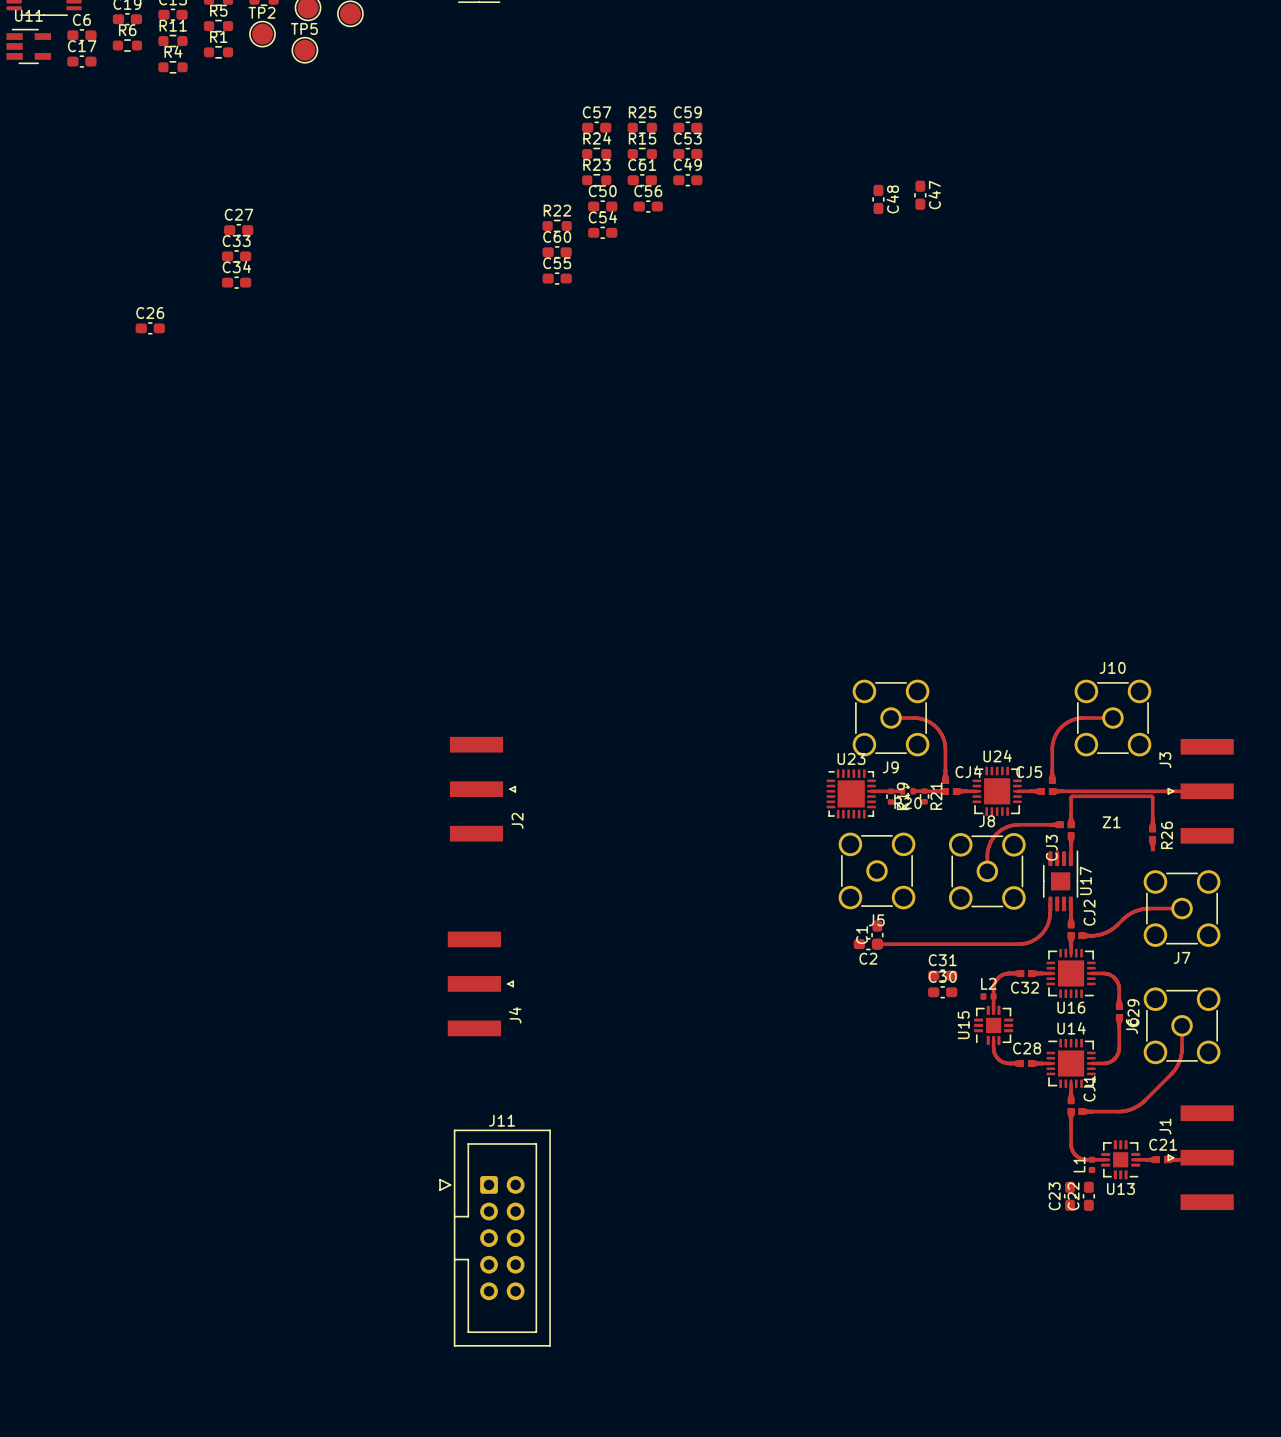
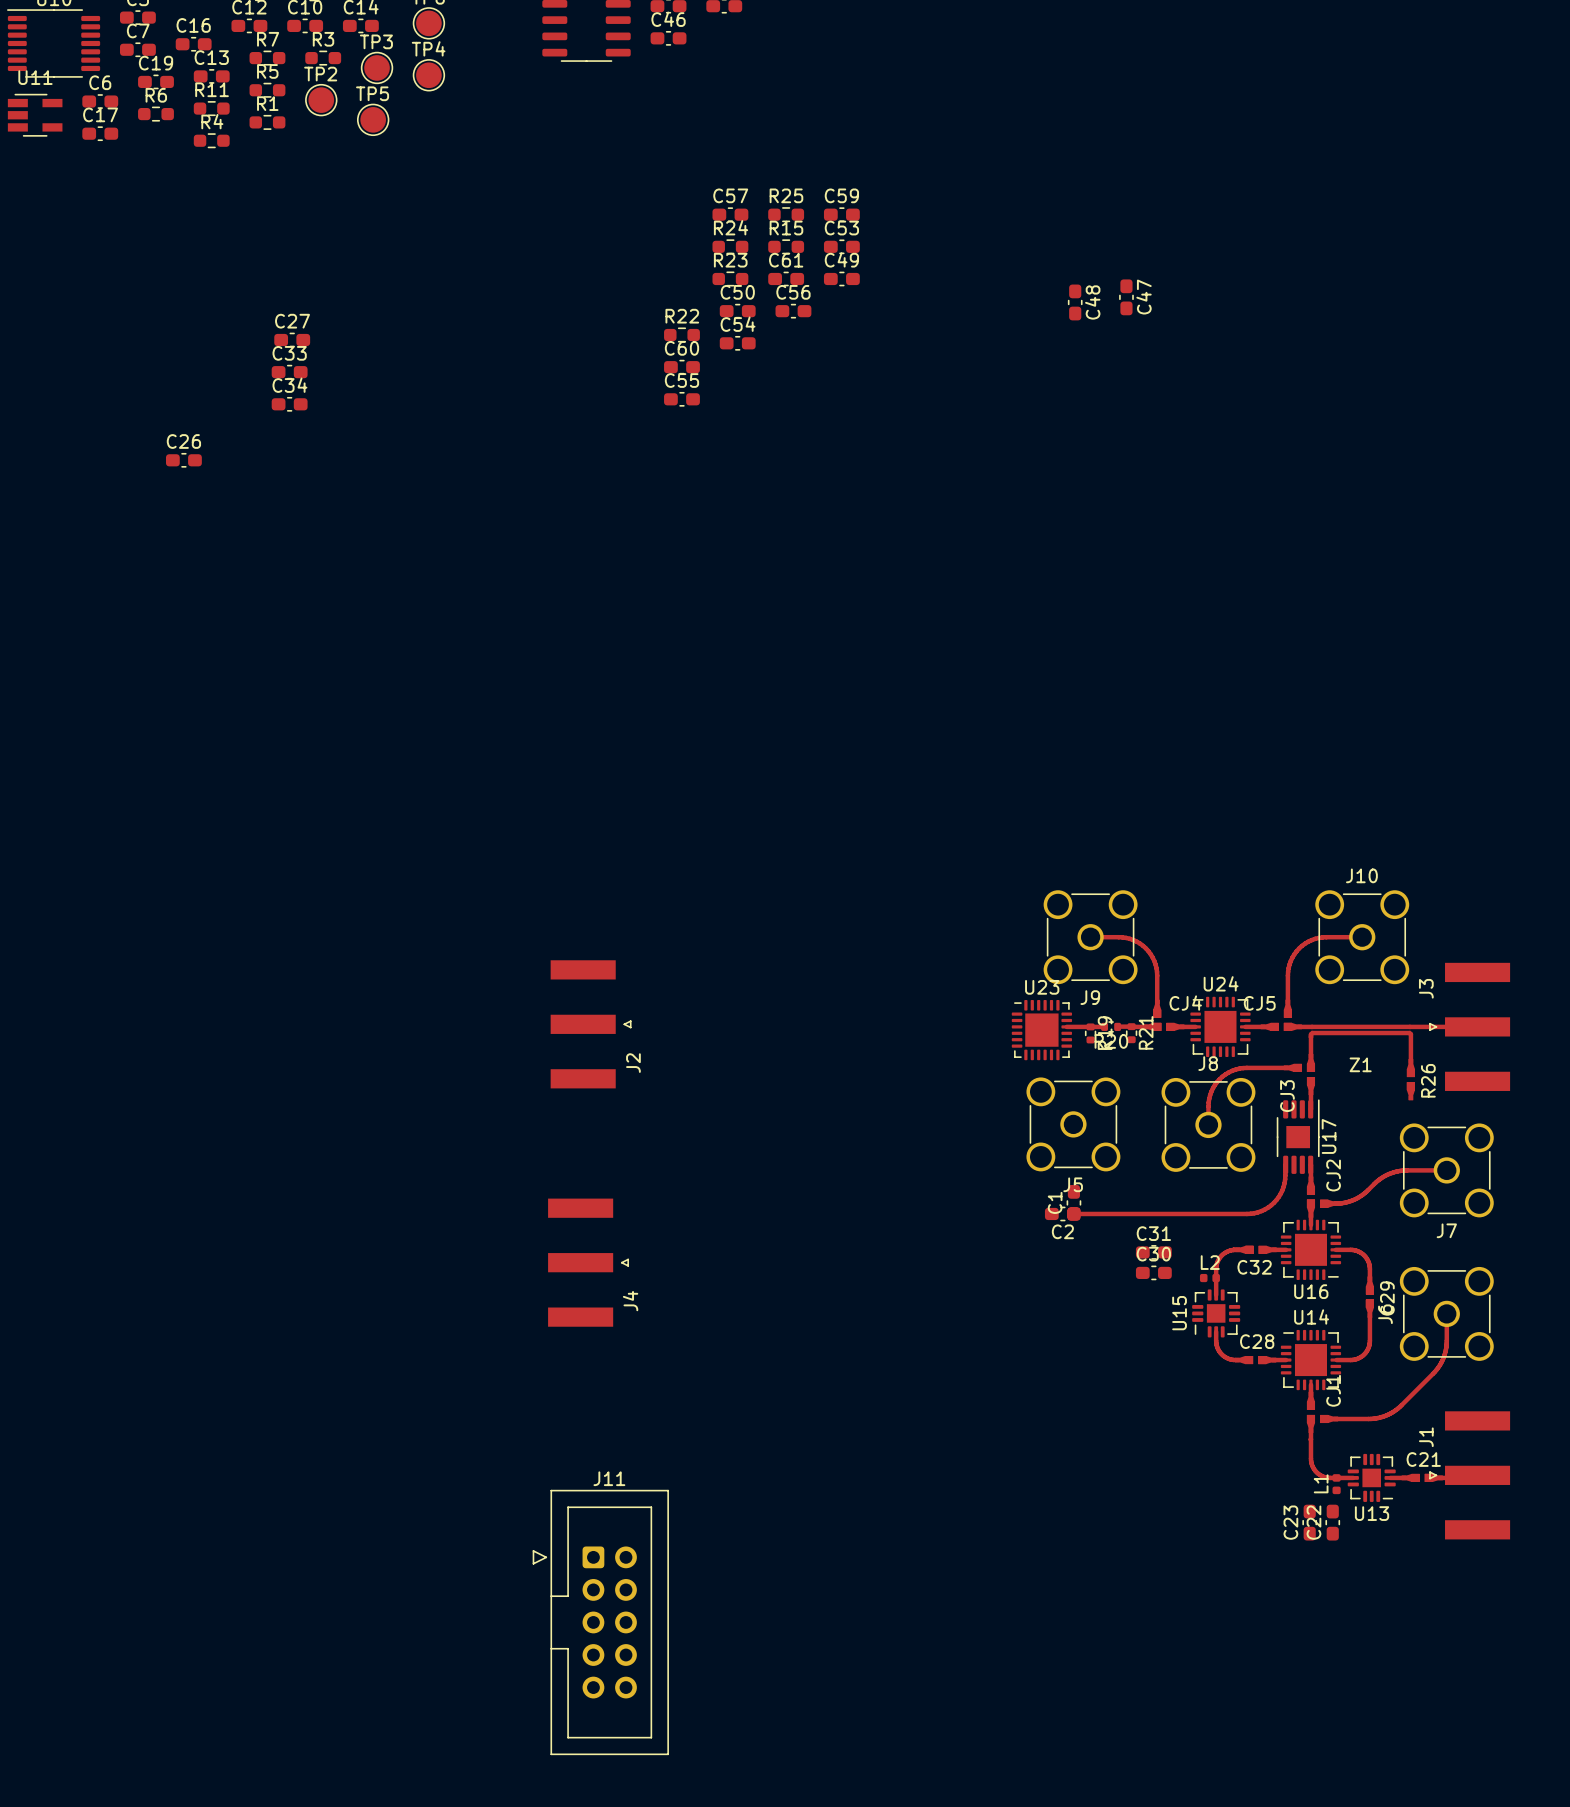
J11 position: (495, 1238) -> (600, 1622)

